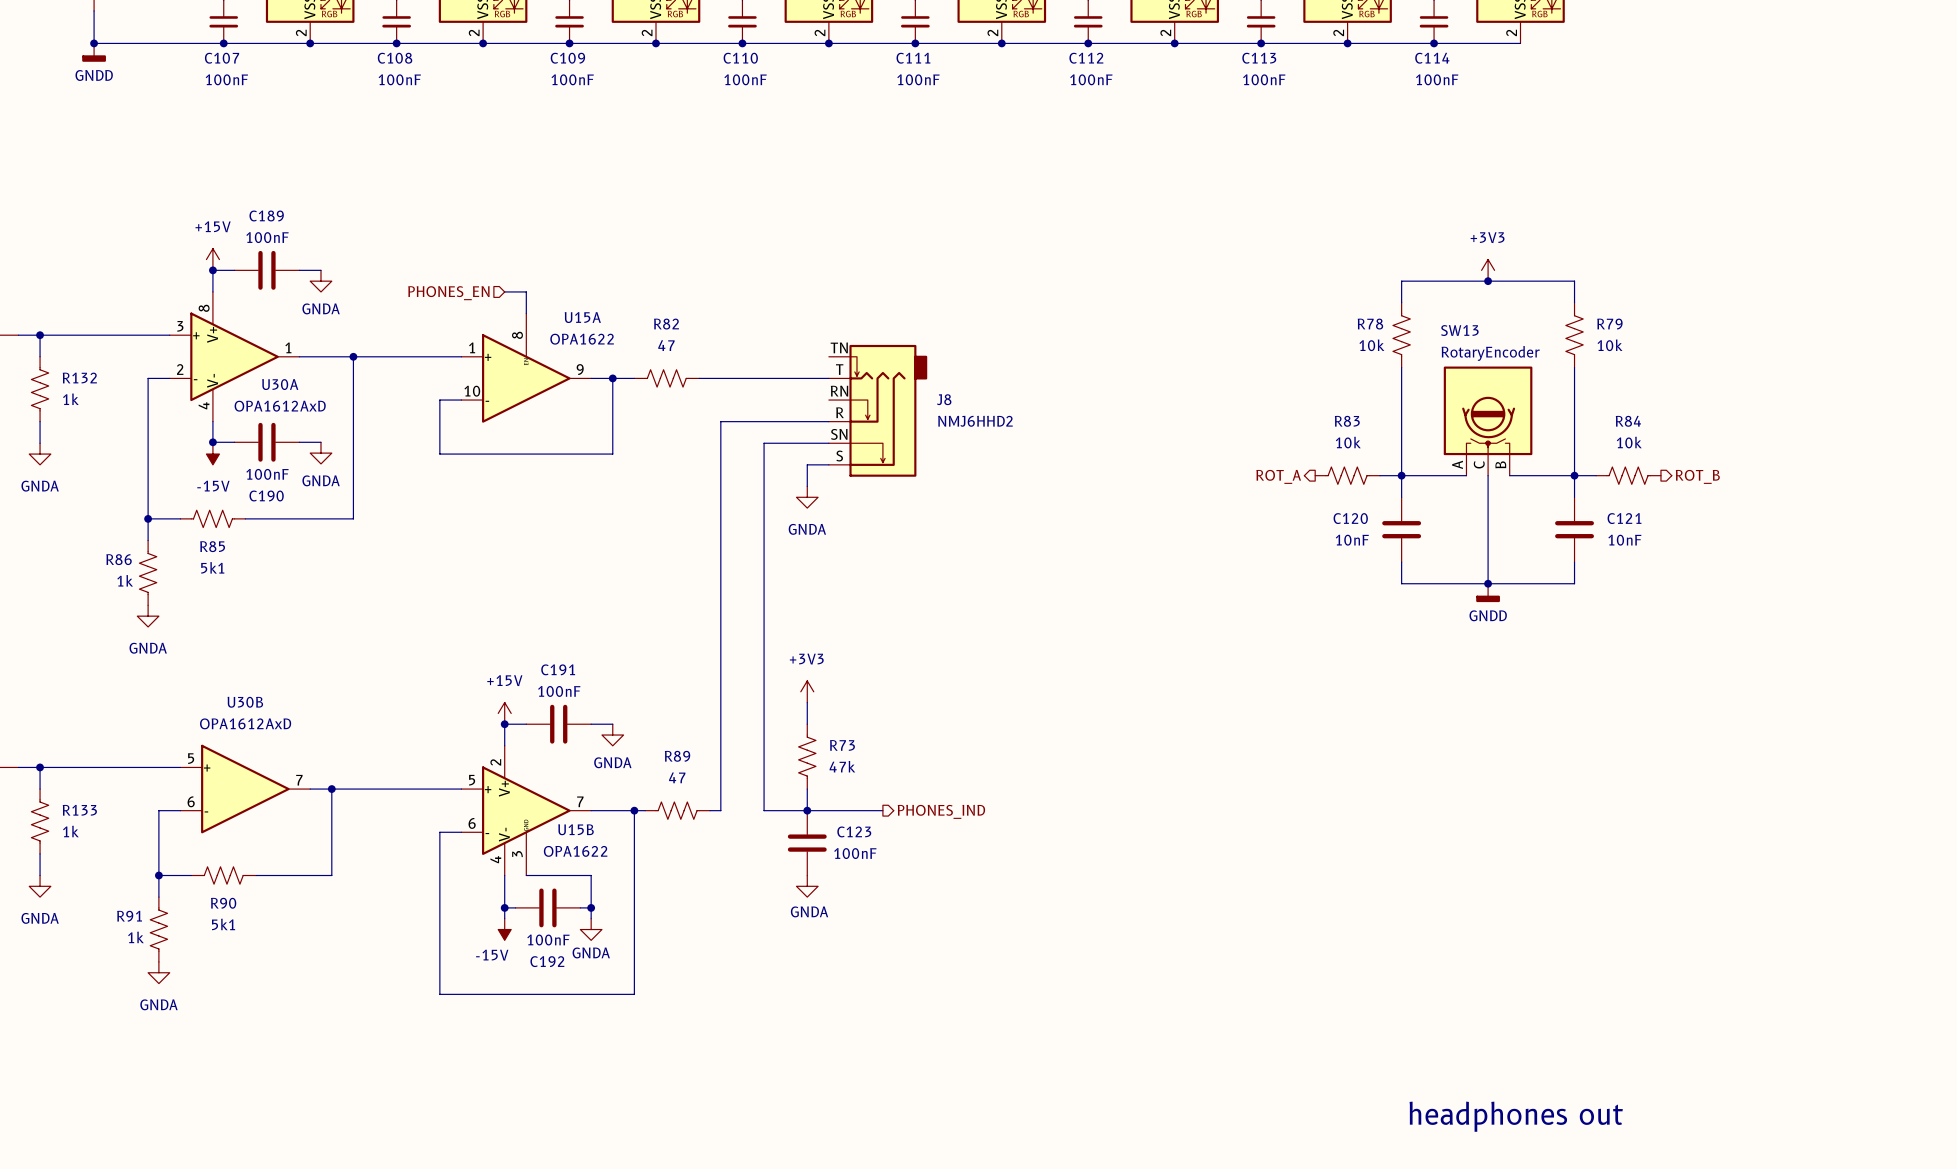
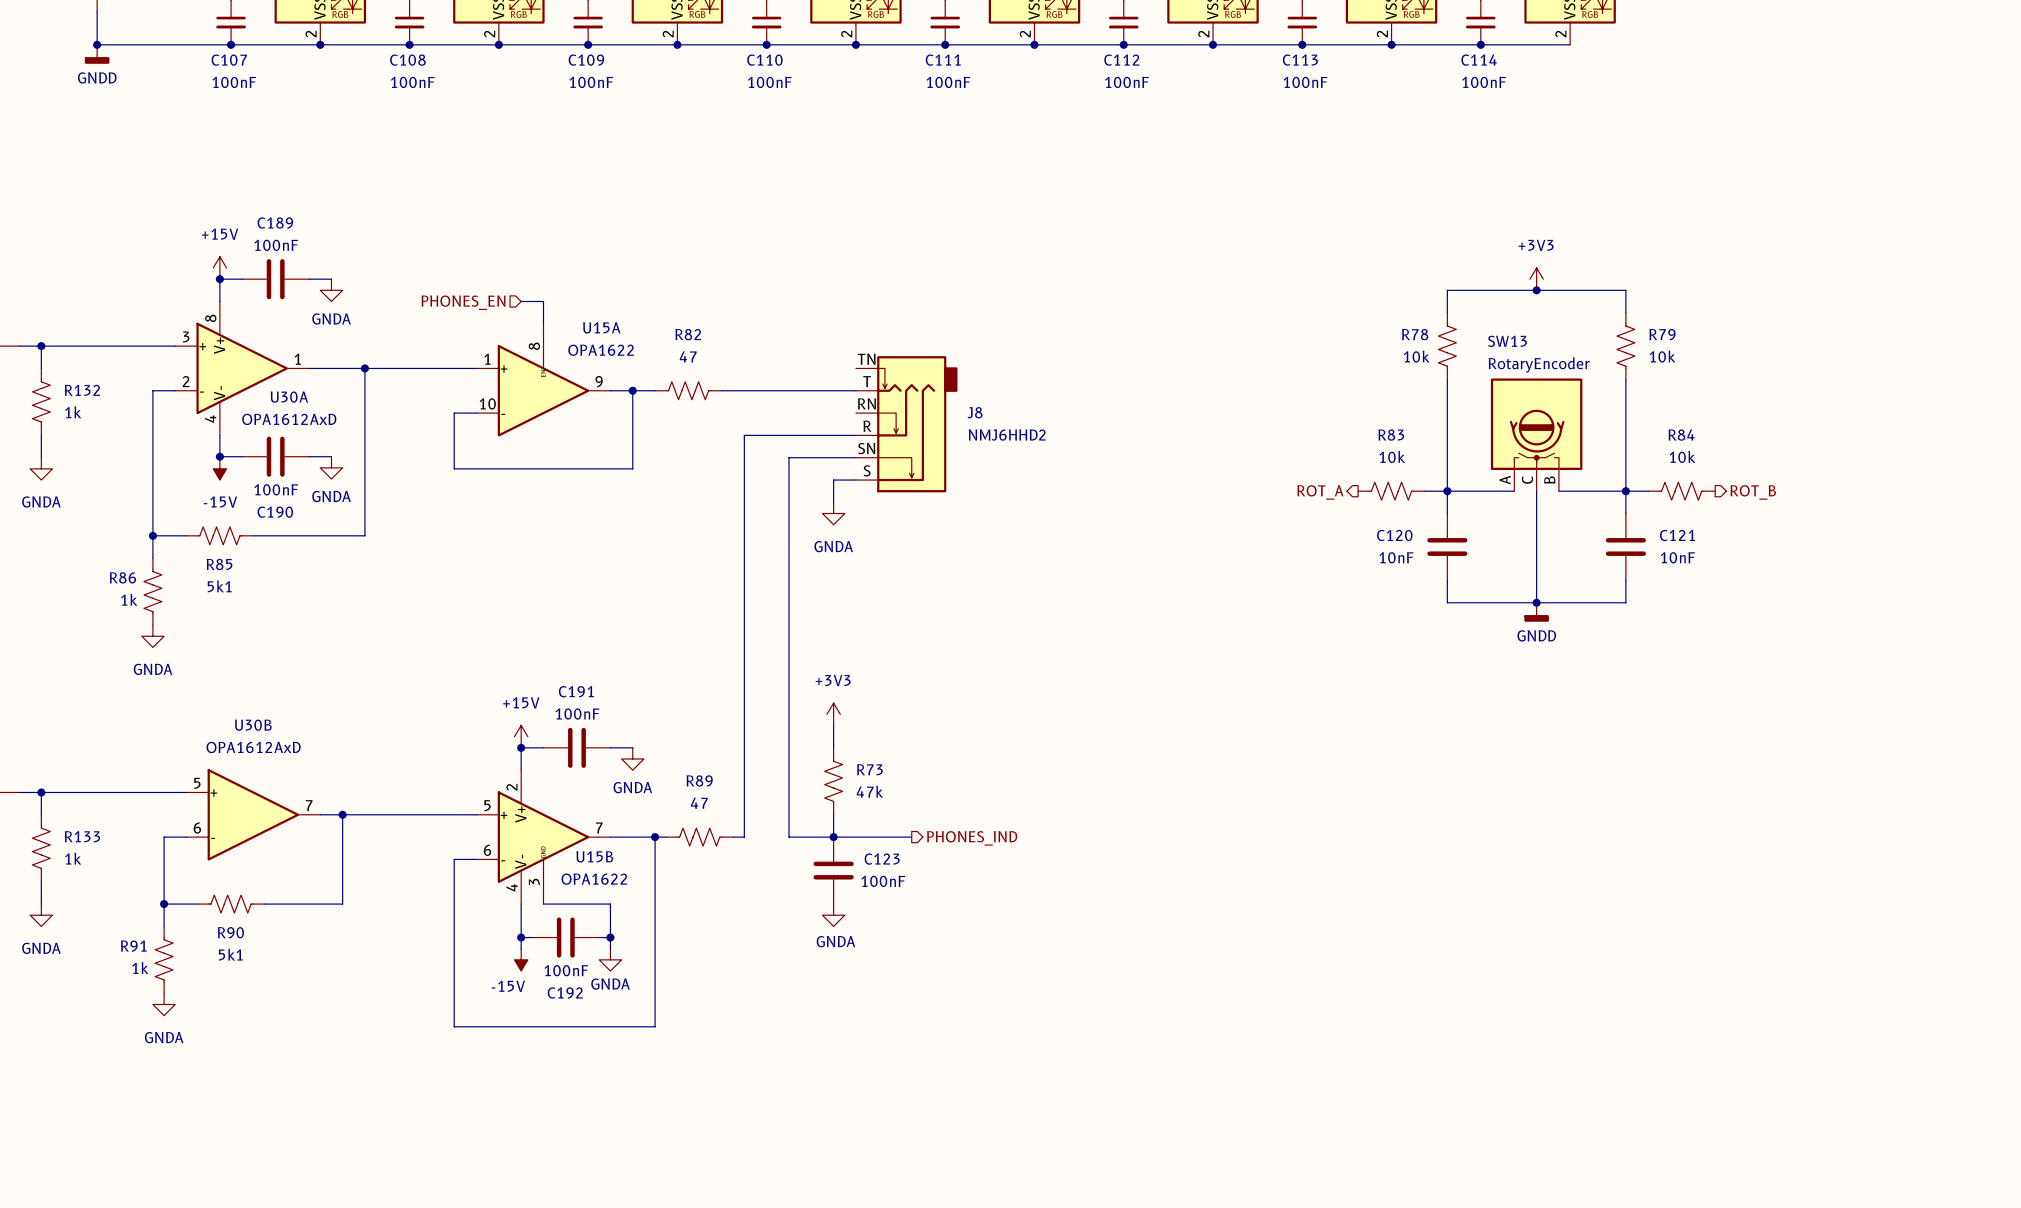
text: headphones out (1516, 1116) -> none

